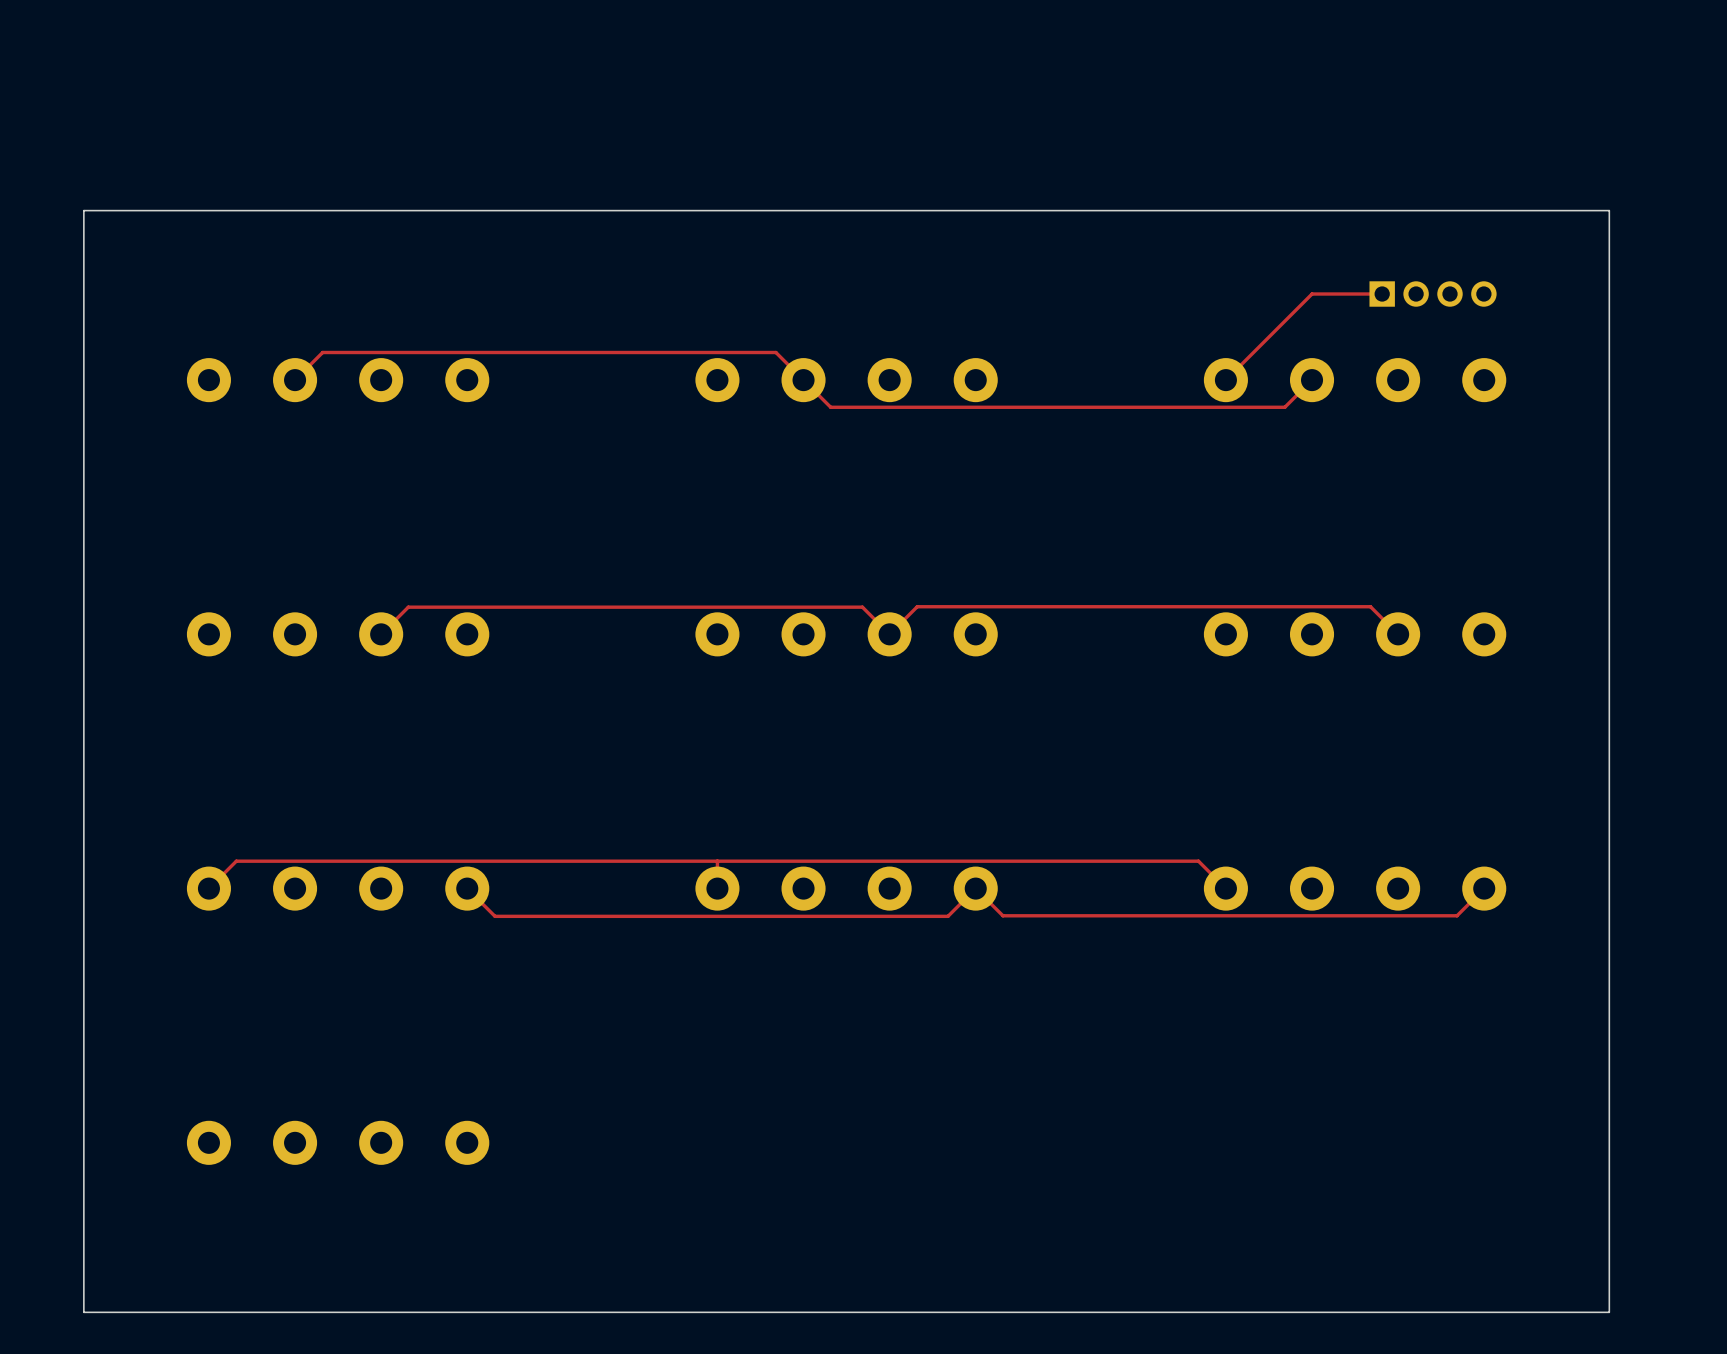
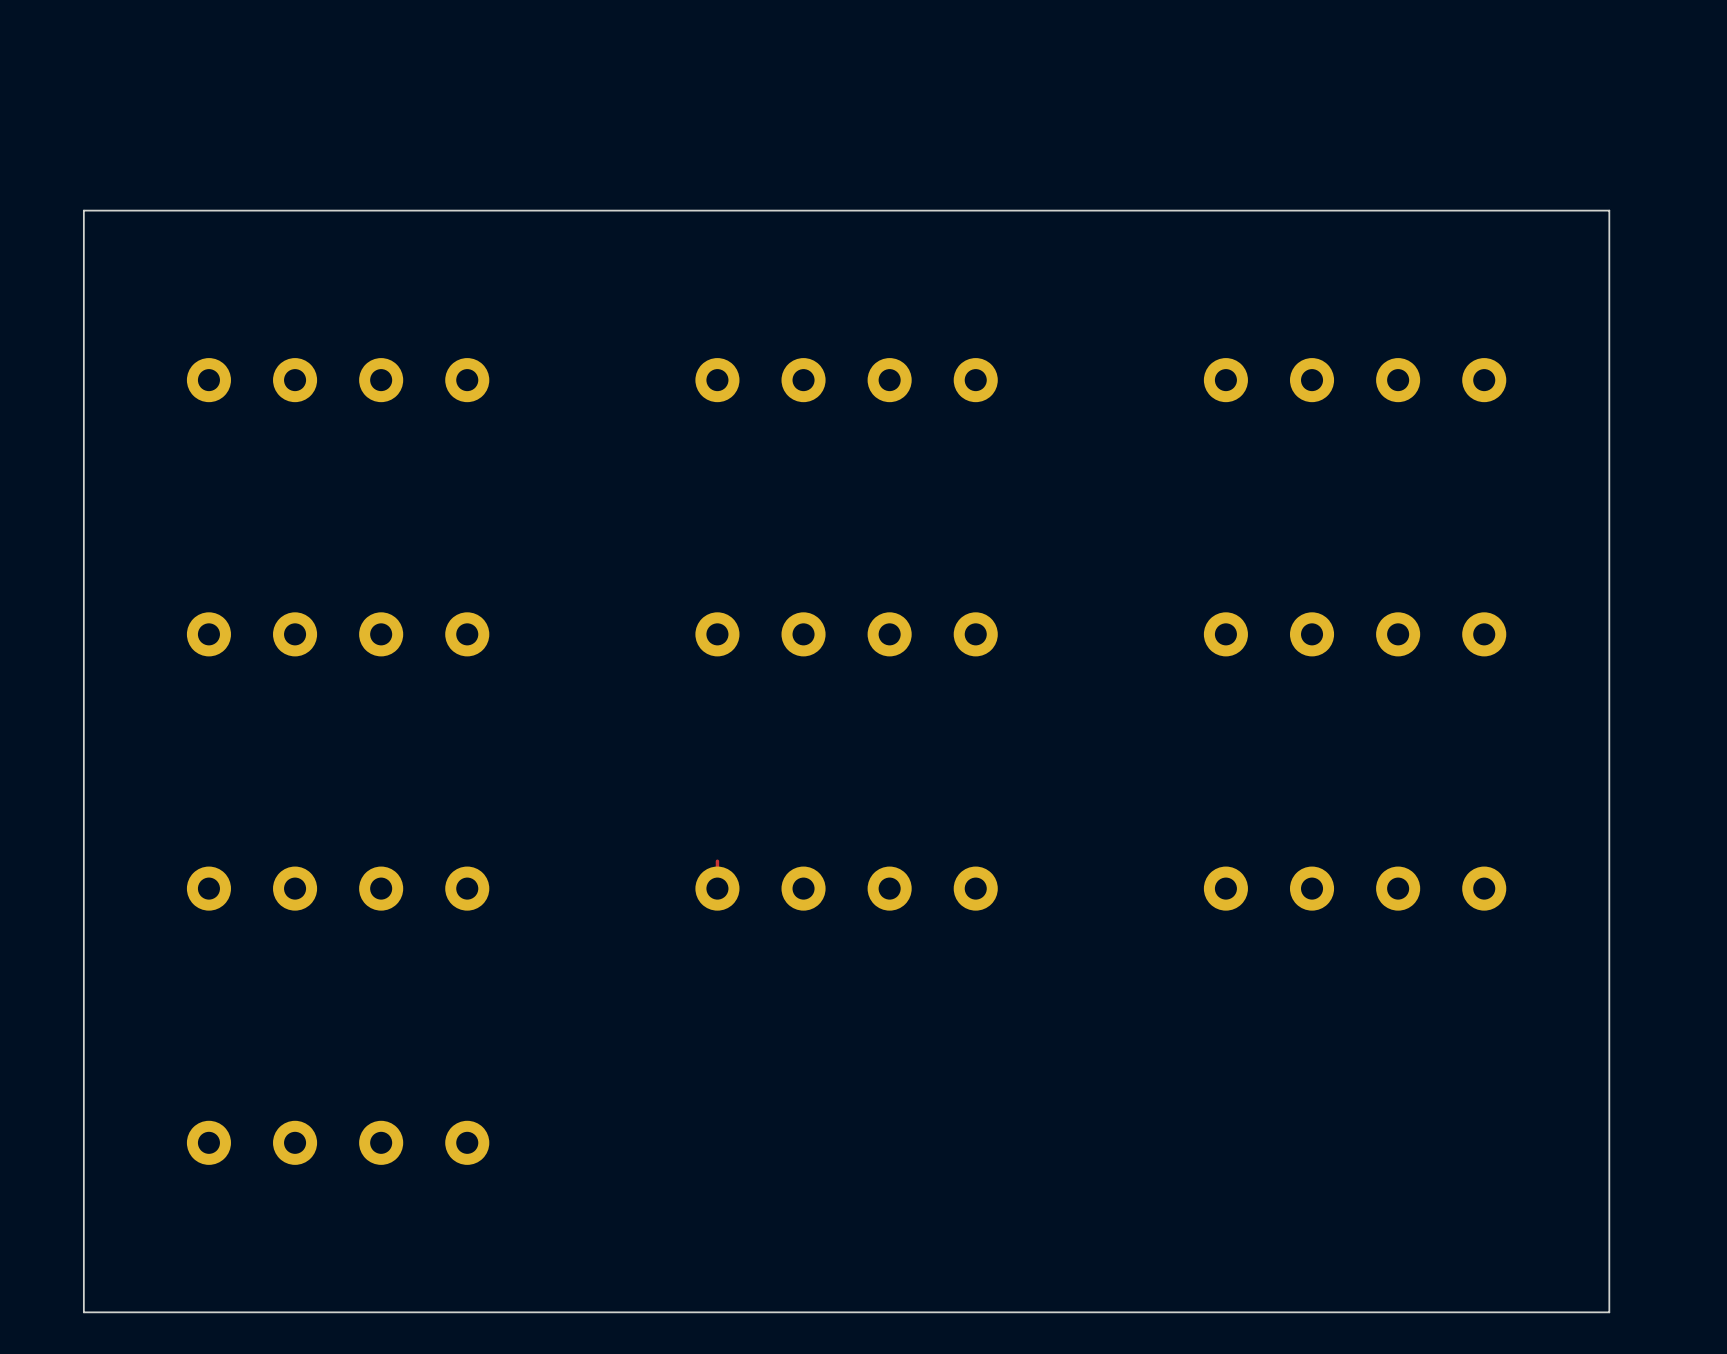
track: (1382, 294) (1312, 294) (1225, 380) -> none
part: (1433, 294) -> none
track: (295, 380) (322, 352) (775, 352) (830, 407) (1284, 407) (1312, 380) -> none
track: (381, 634) (408, 607) (862, 607) (889, 634) (917, 606) (1370, 606) (1398, 634) -> none
track: (208, 888) (236, 861) (1198, 861) (1225, 888) -> none
track: (467, 888) (495, 916) (948, 916) (975, 888) (1002, 915) (1457, 915) (1484, 888) -> none

